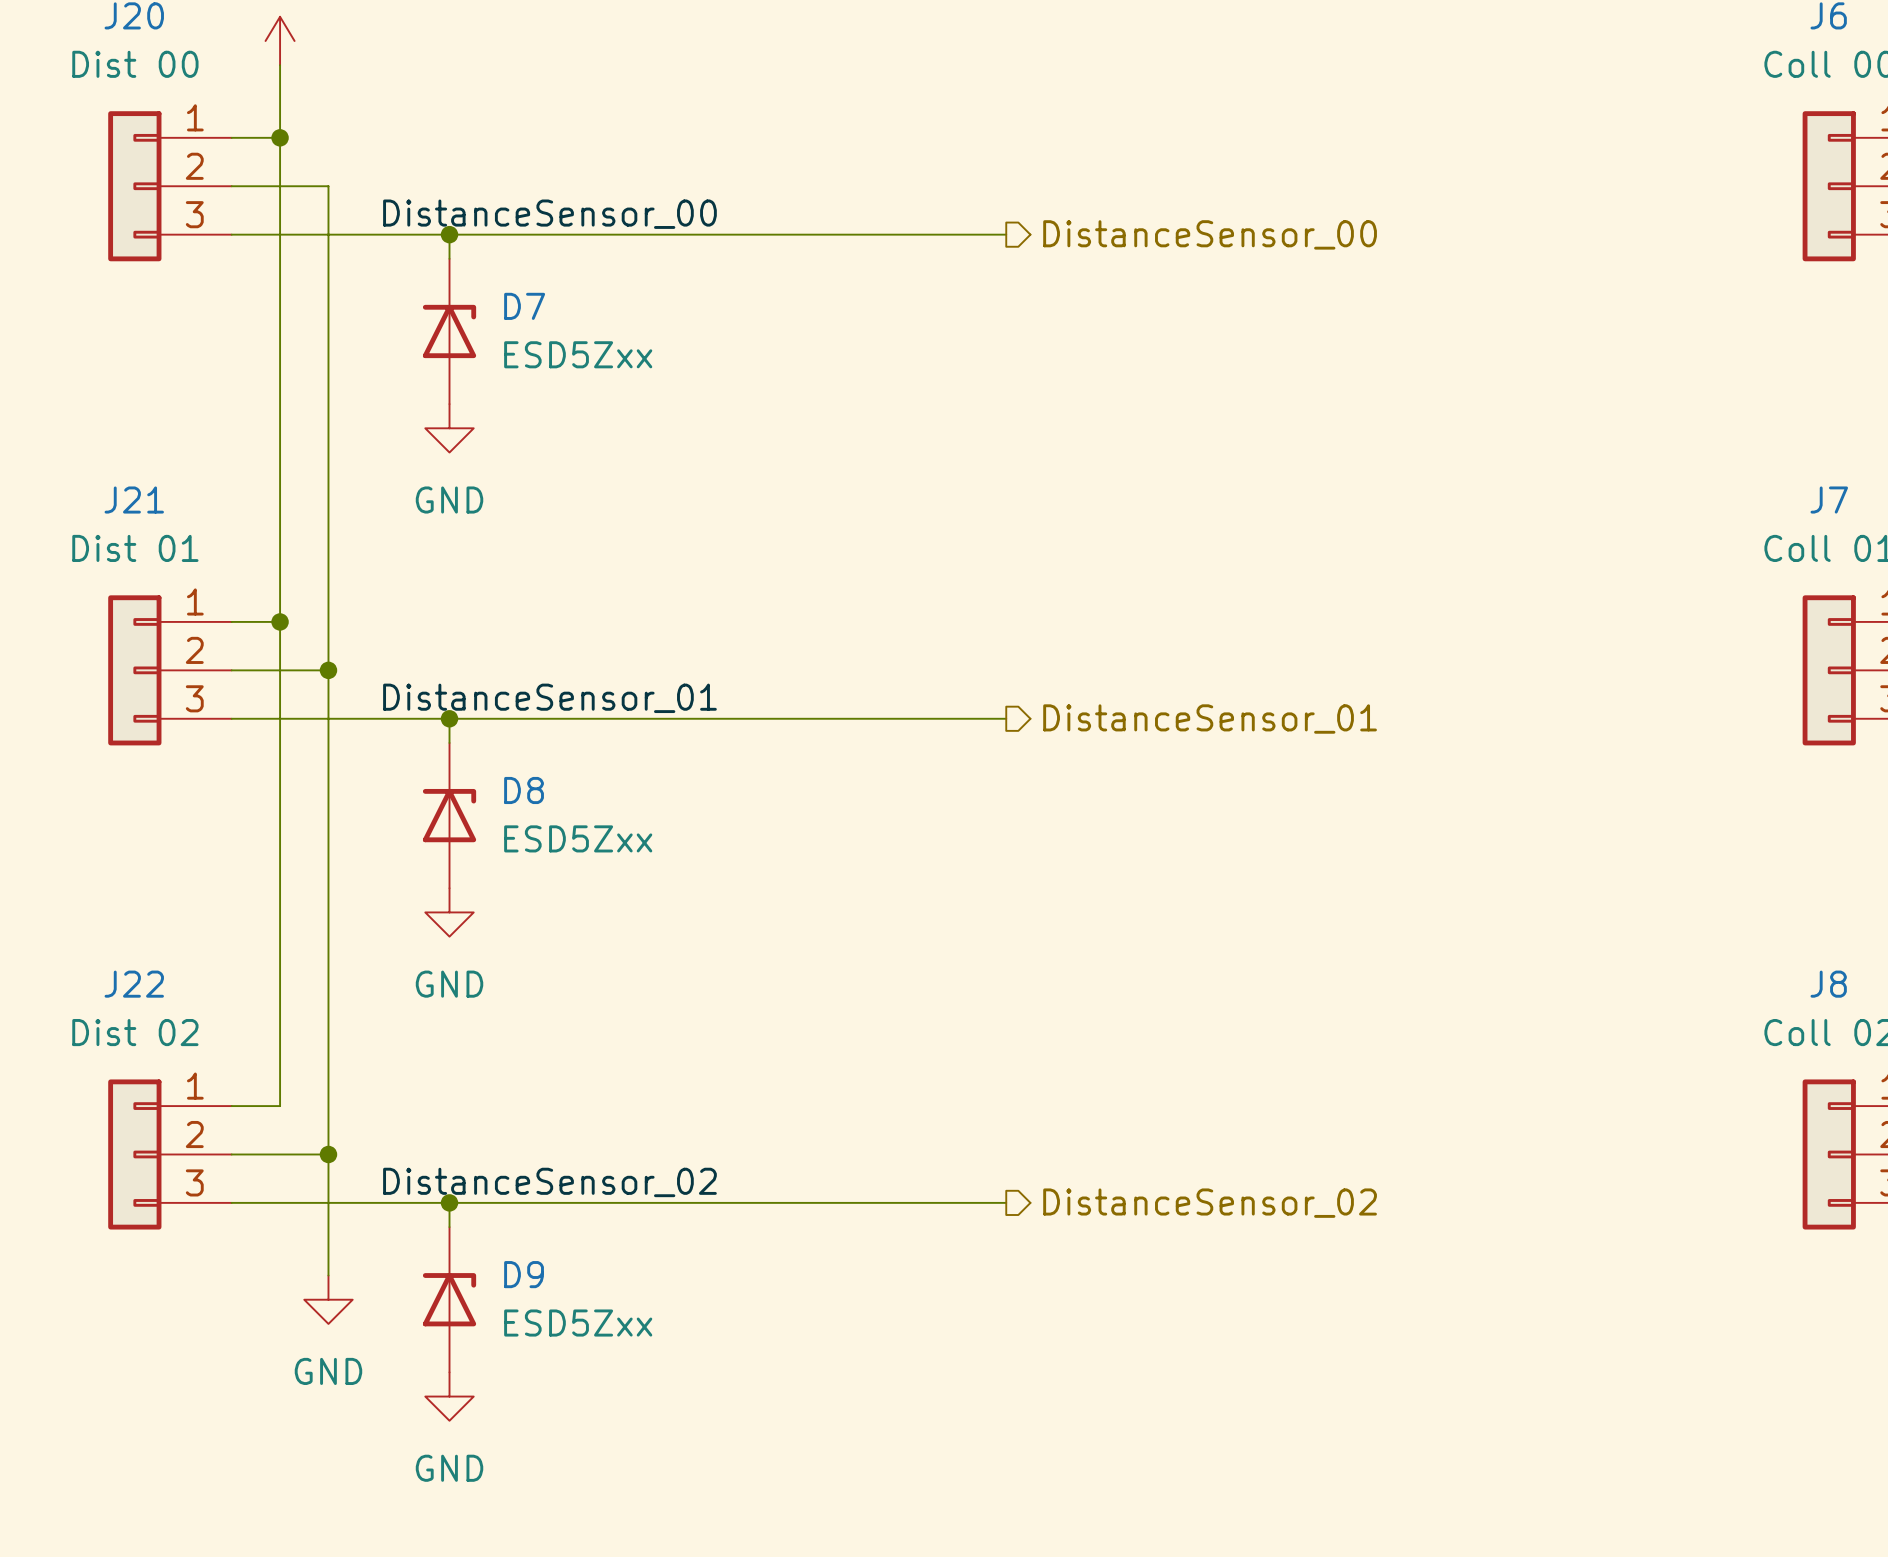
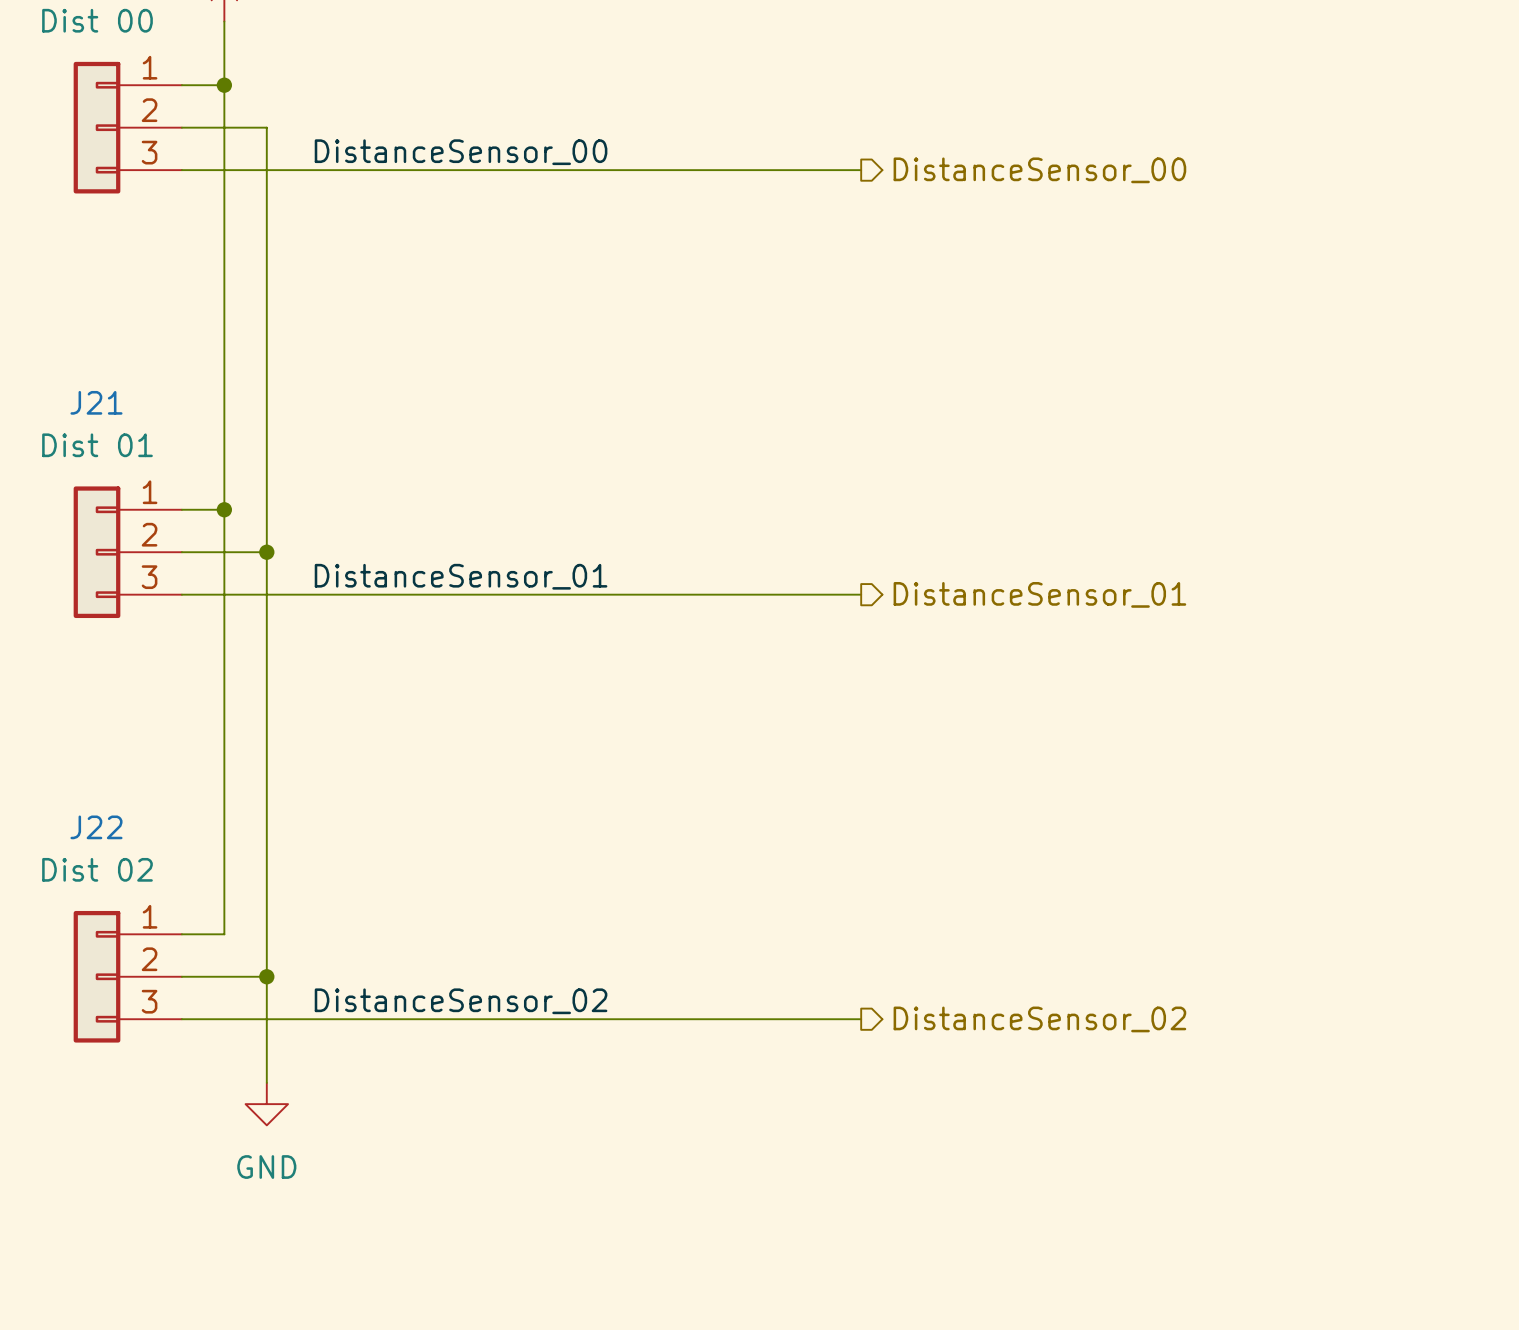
wire: (449, 234) (449, 258) -> none
junction: (449, 234) -> none
D7: ESD5Zxx (449, 331) -> none
power symbol: GND (449, 428) -> none
wire: (449, 718) (449, 742) -> none
junction: (449, 718) -> none
D8: ESD5Zxx (449, 815) -> none
power symbol: GND (449, 912) -> none
wire: (449, 1202) (449, 1227) -> none
junction: (449, 1202) -> none
D9: ESD5Zxx (449, 1299) -> none
power symbol: GND (449, 1396) -> none

